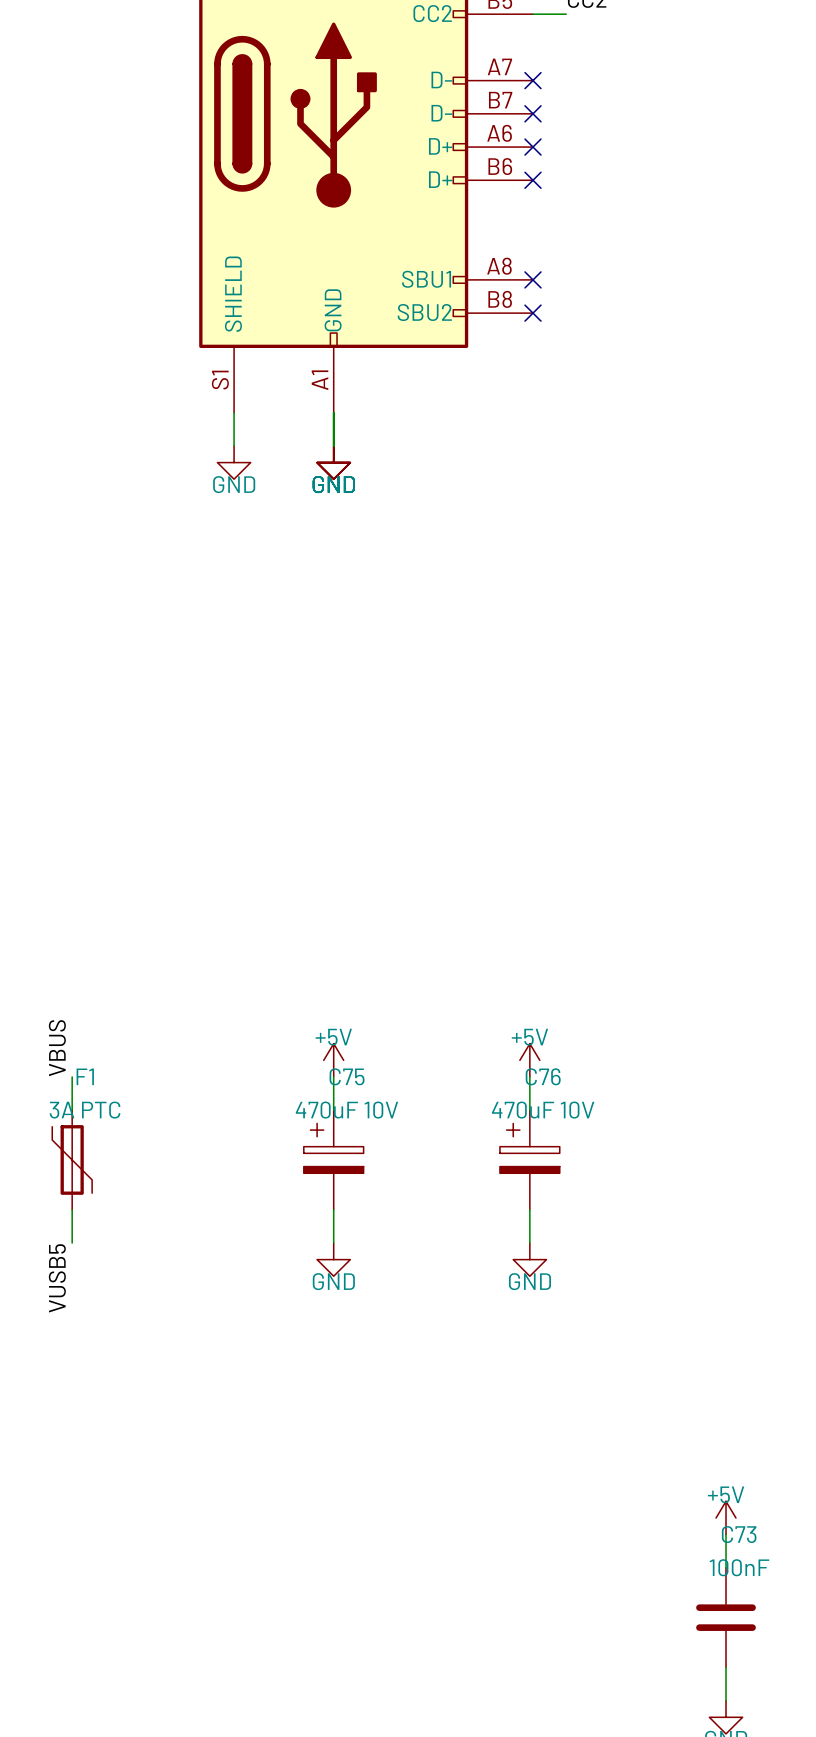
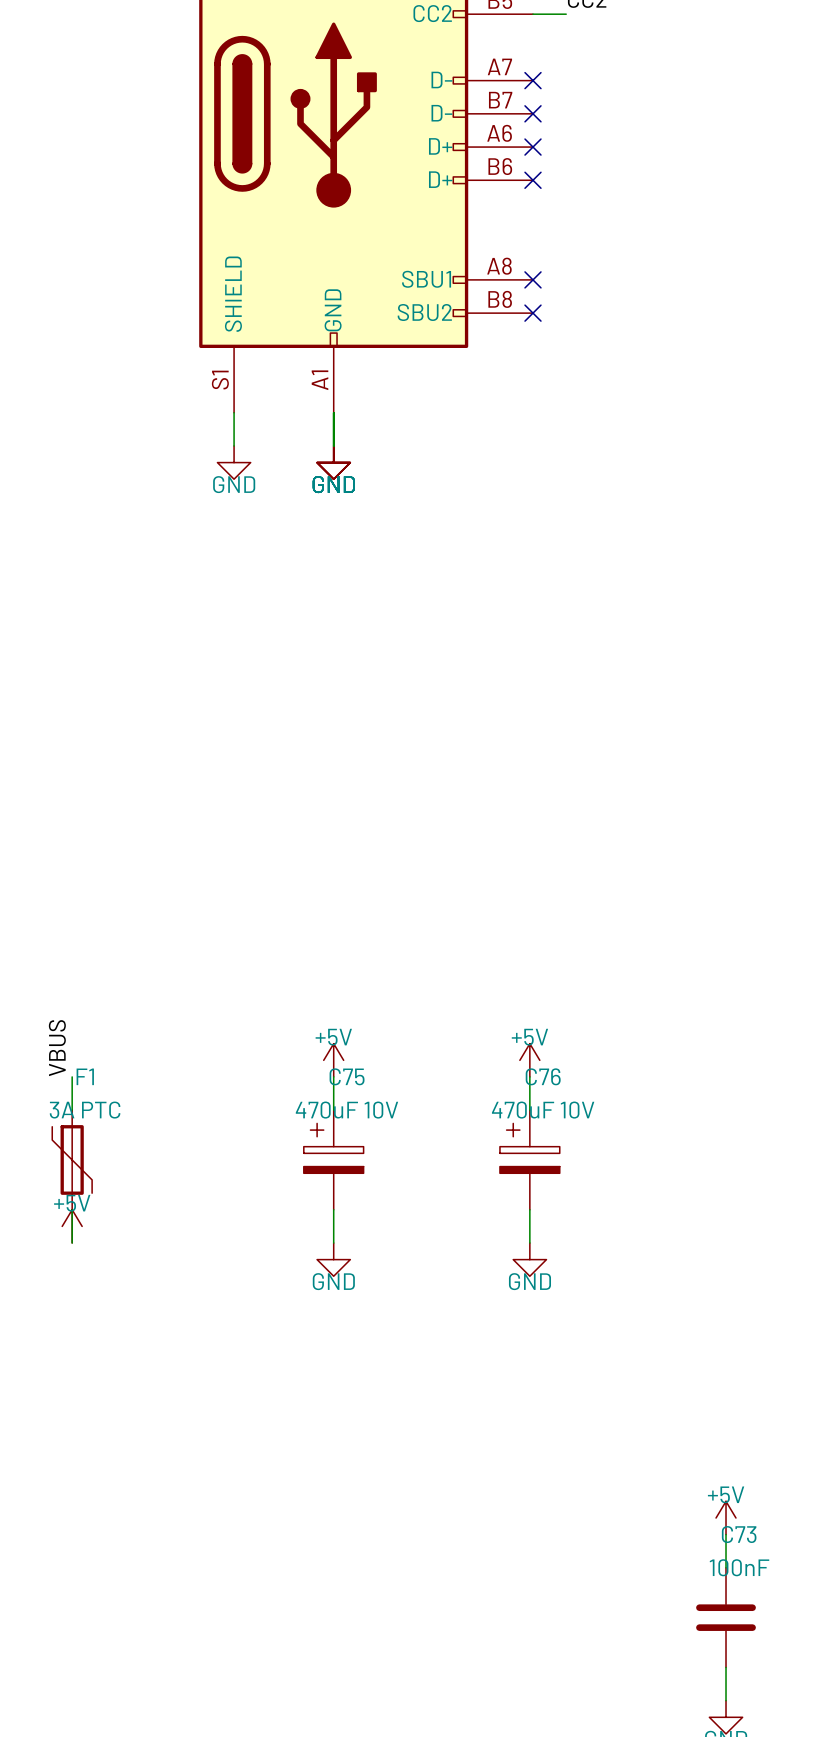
power symbol: none -> +5V (72, 1226)
label: VUSB5 (57, 1278) -> none

